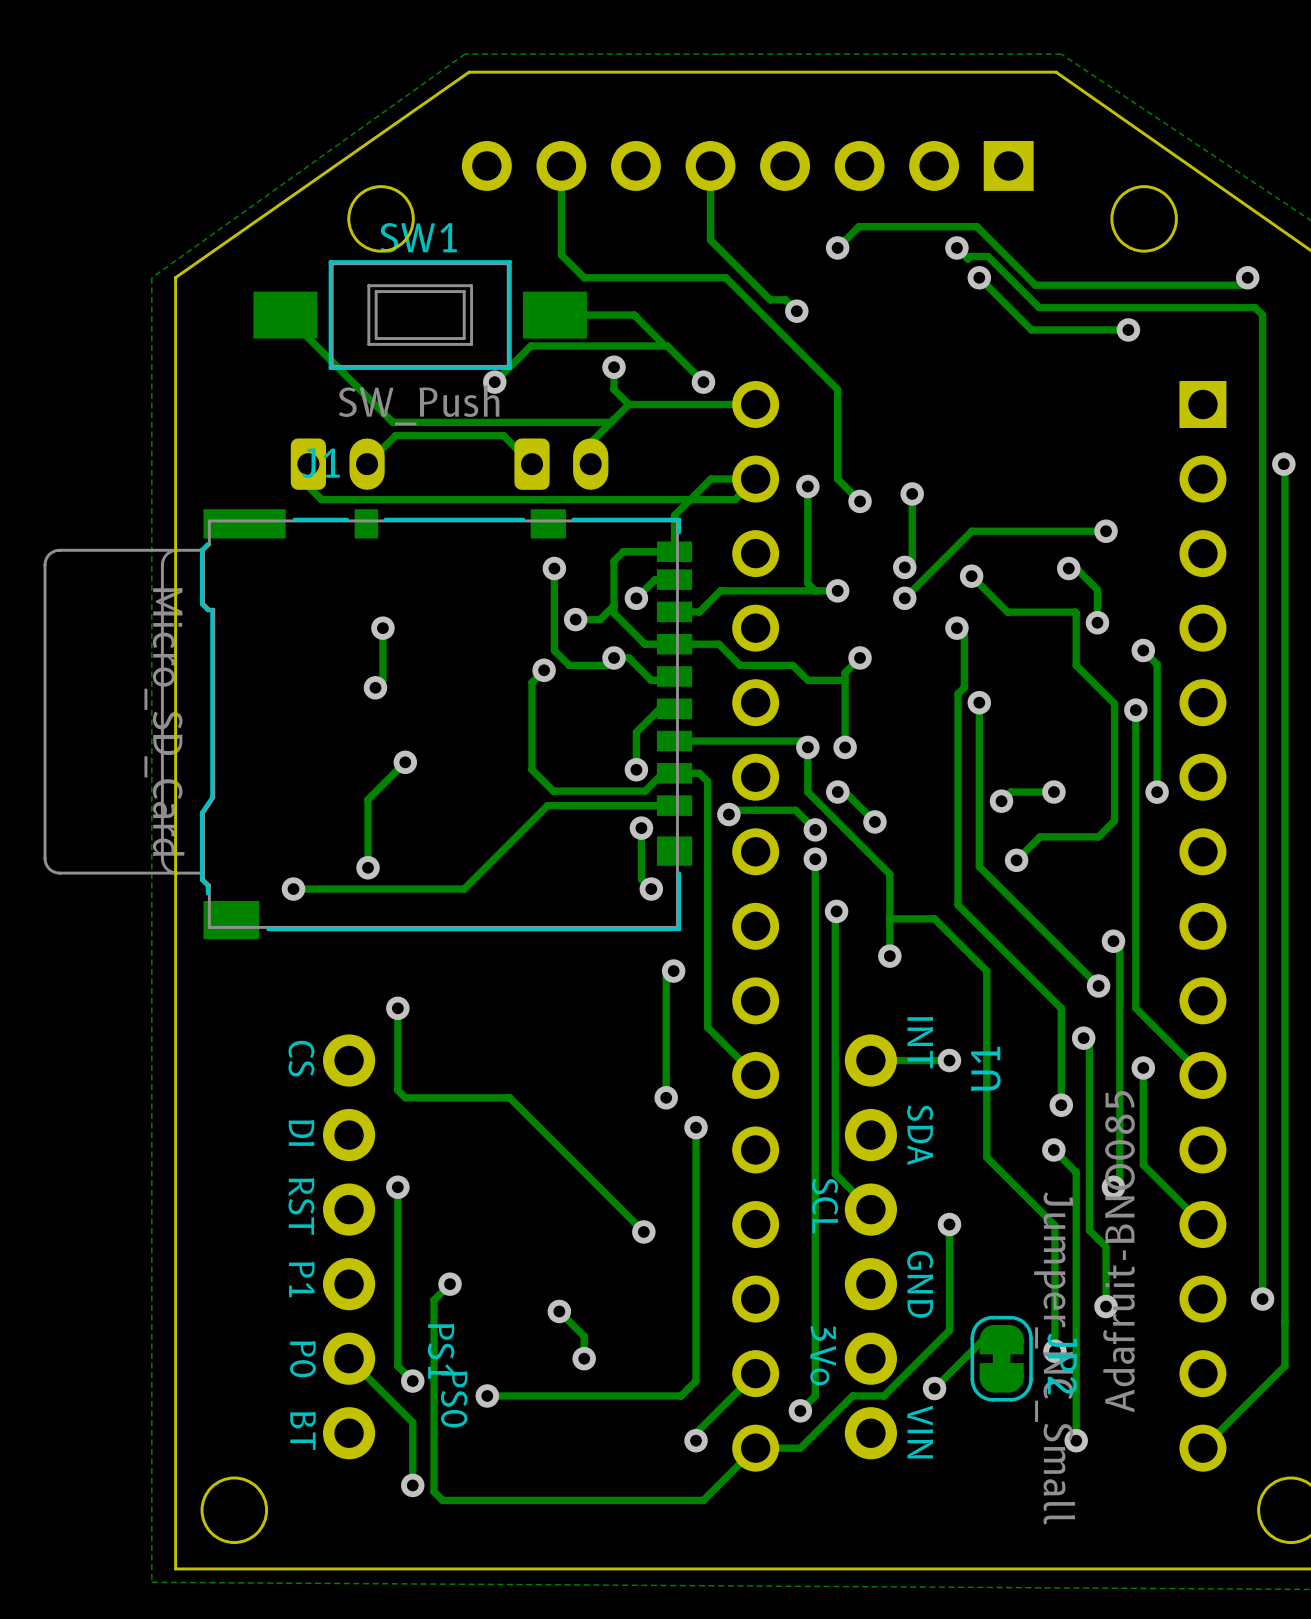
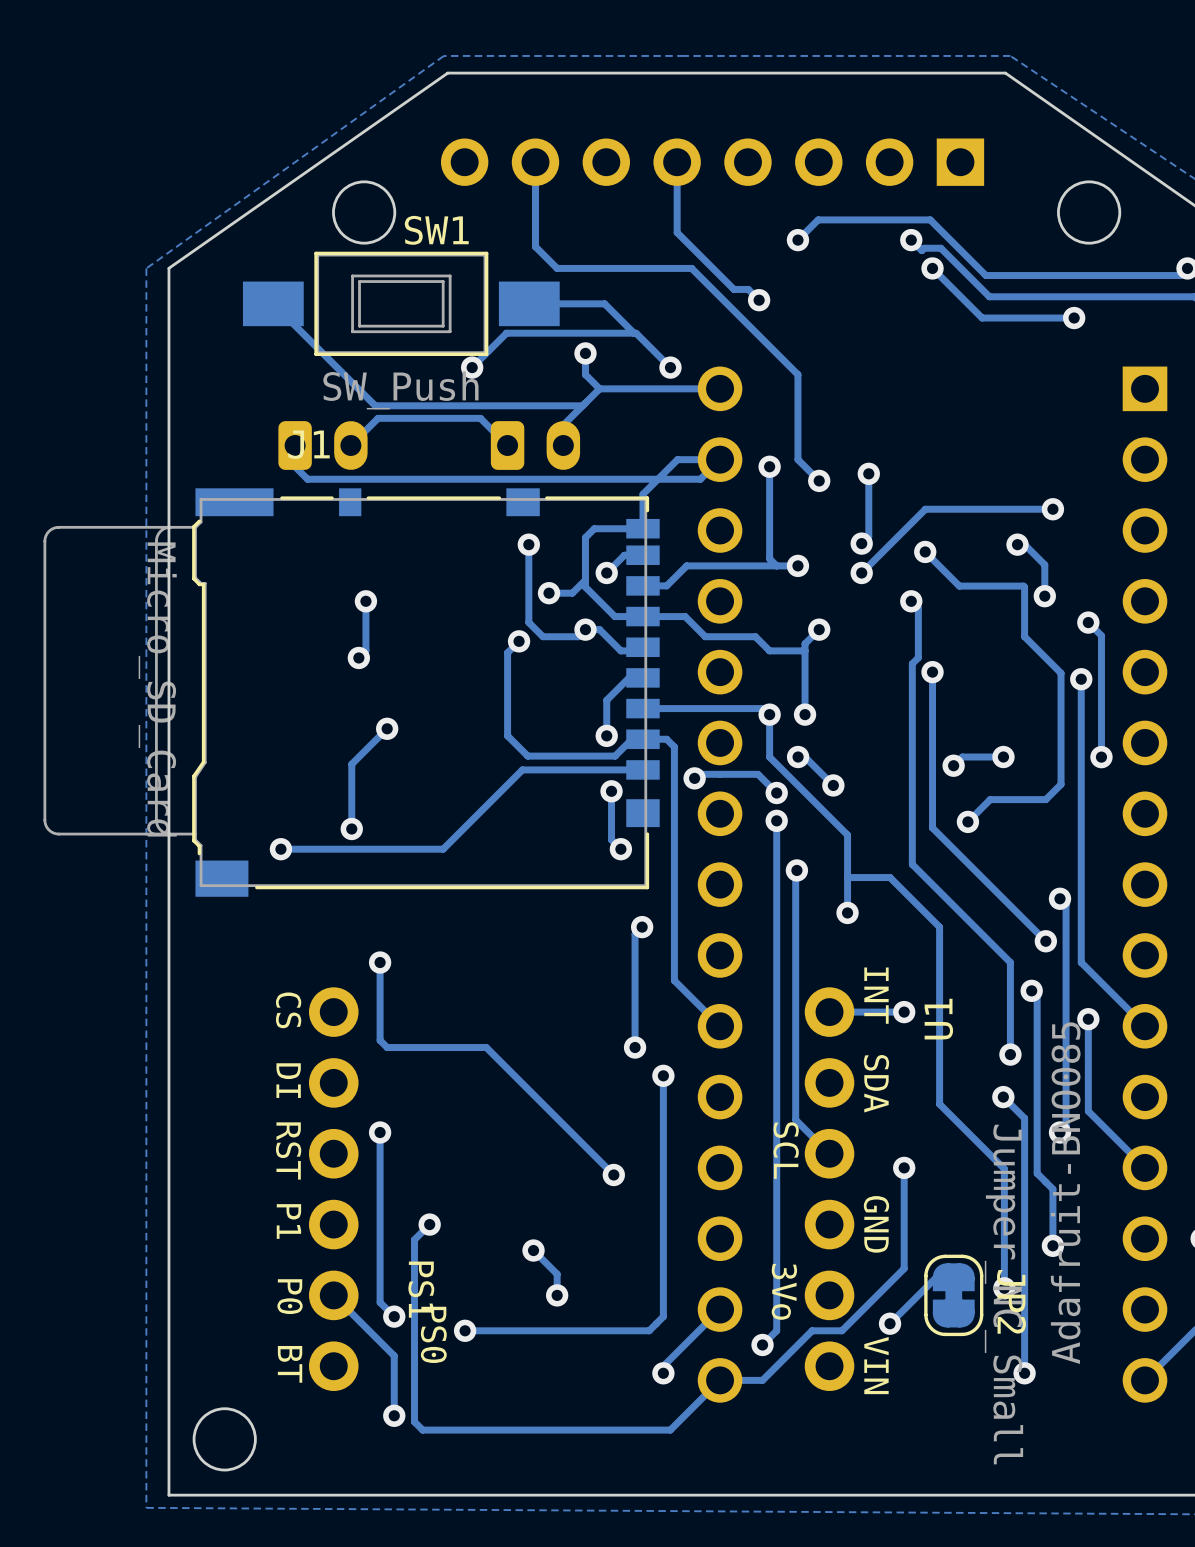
SW1 name position: SW1 (418, 237) -> SW1 (436, 230)

